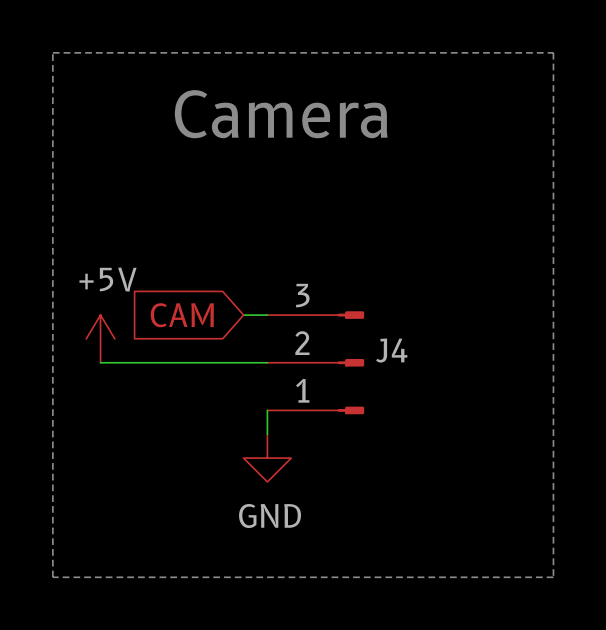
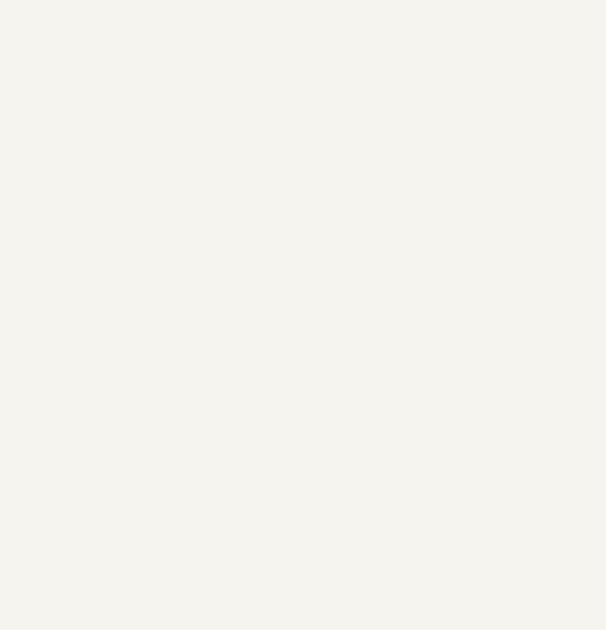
line: (52, 52) (52, 577) (553, 577) (553, 52) (52, 52) -> none
text: Camera (281, 114) -> none
global label: CAM (182, 315) -> none
wire: (243, 315) (267, 315) -> none
power symbol: +5V (100, 338) -> none
wire: (100, 362) (267, 362) -> none
J4: (315, 362) -> none
wire: (267, 410) (267, 434) -> none
power symbol: GND (267, 458) -> none

